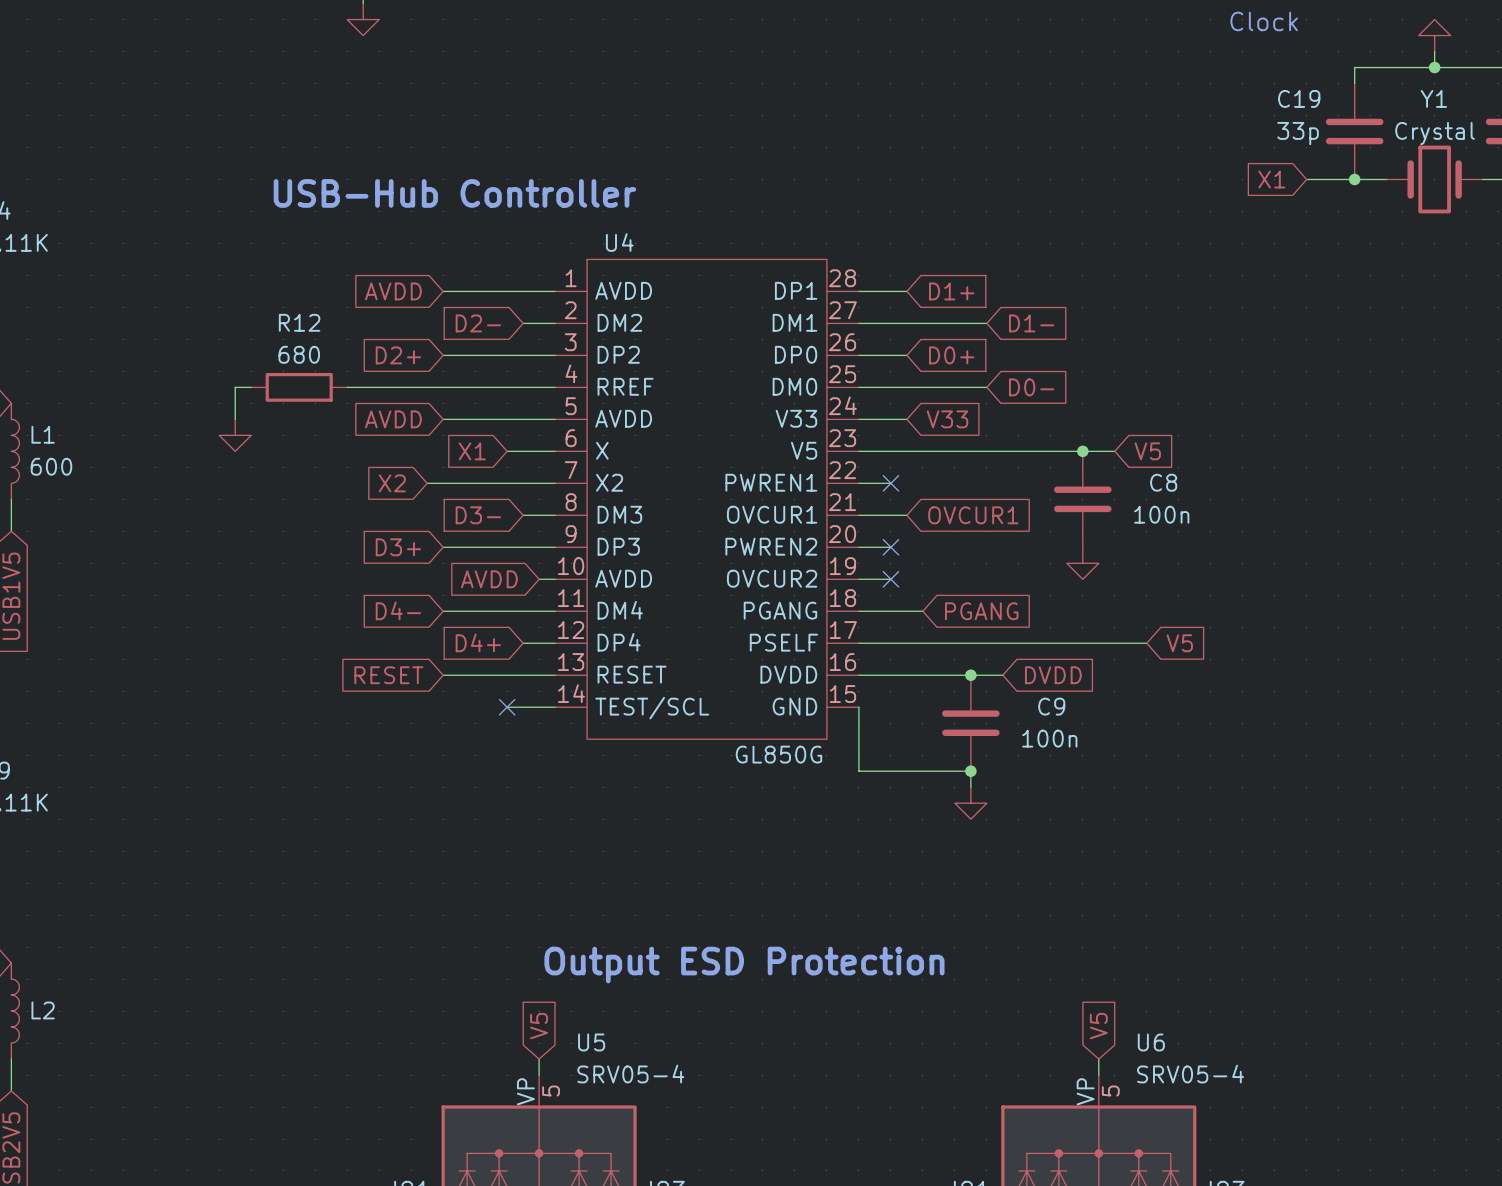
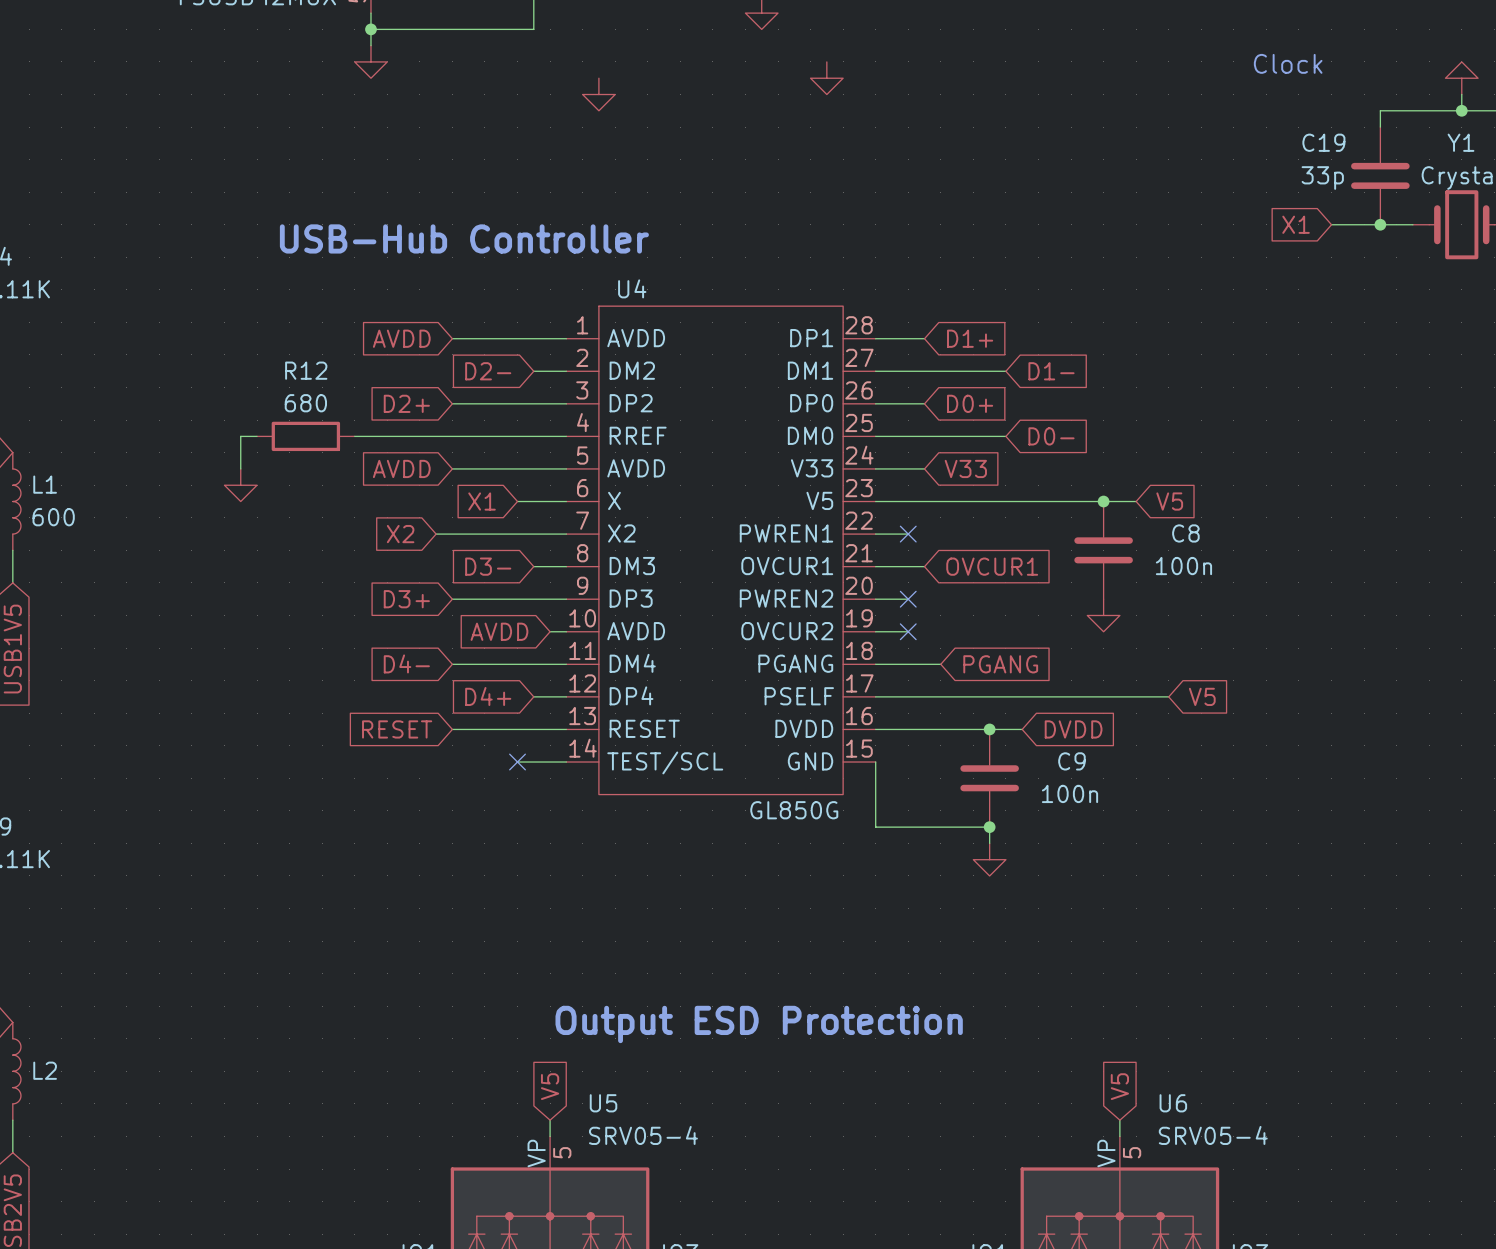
power symbol: none -> (826, 78)
power symbol: none -> (598, 94)

